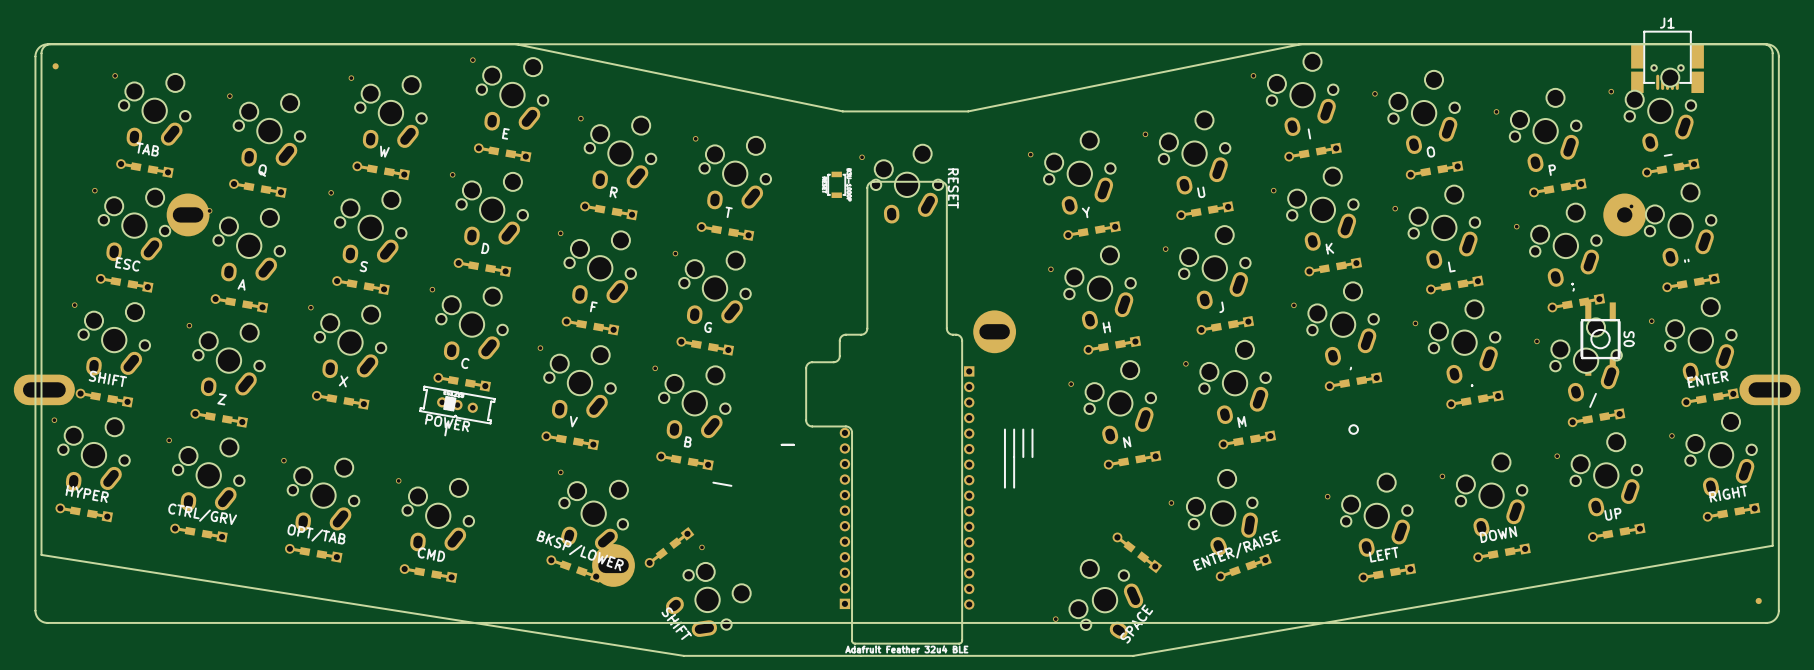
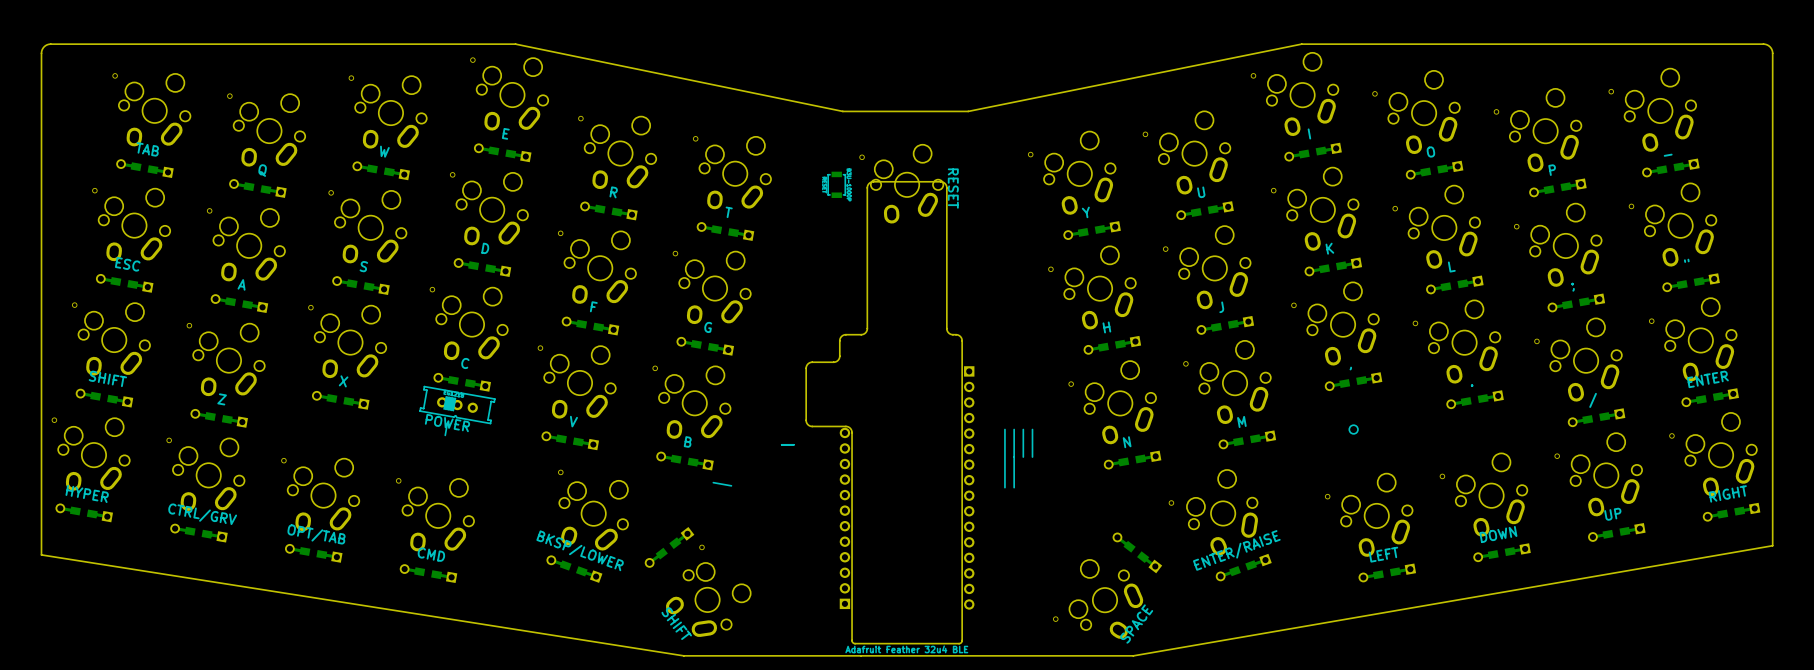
board edge: (1766, 44) (44, 44) (37, 49) (35, 56) (35, 613) (40, 620) (47, 622) (1769, 622) (1776, 618) (1778, 610) (1778, 56) (1775, 47) (1766, 44) -> none
J1: (1667, 62) -> none
part: (55, 66) -> none
part: (188, 214) -> none
part: (1624, 214) -> none
part: (994, 331) -> none
S0: (1600, 339) -> none
part: (44, 389) -> none
part: (1769, 389) -> none
part: (613, 565) -> none
part: (1758, 600) -> none

